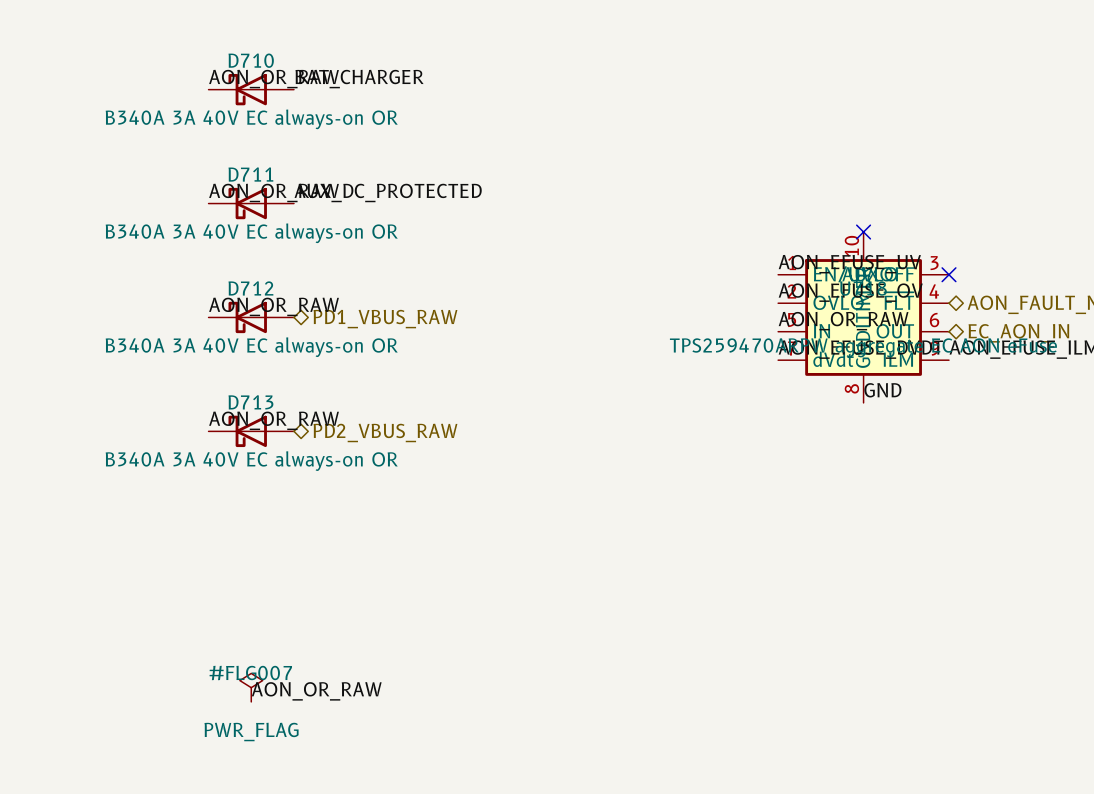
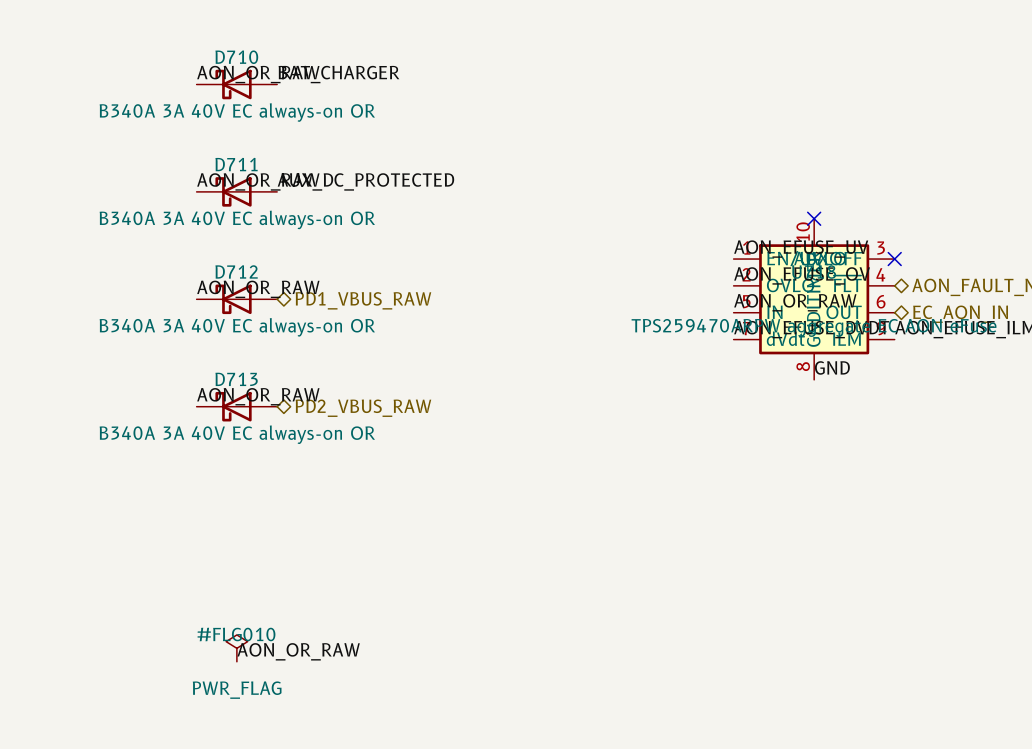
#FLG007 name: #FLG007 (250, 673) -> #FLG010 (236, 634)

